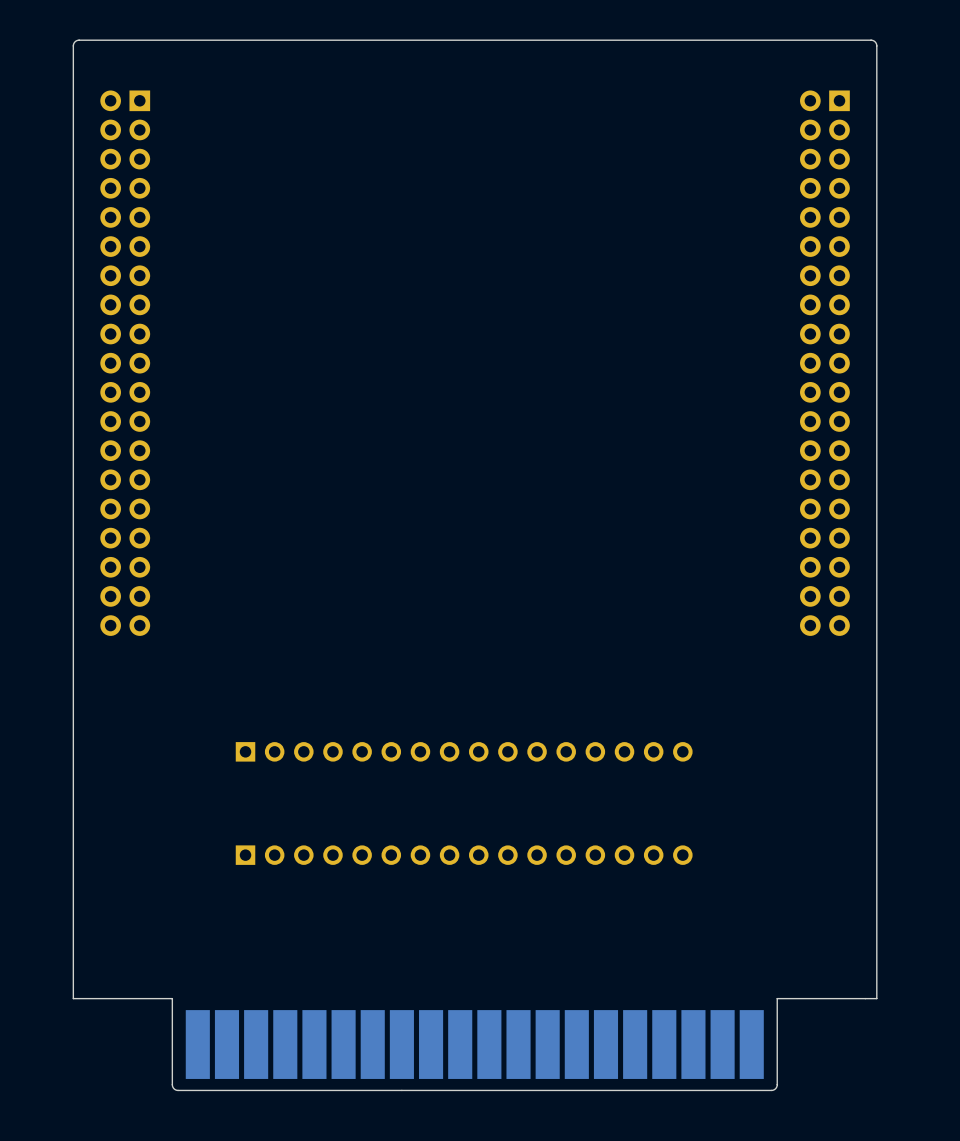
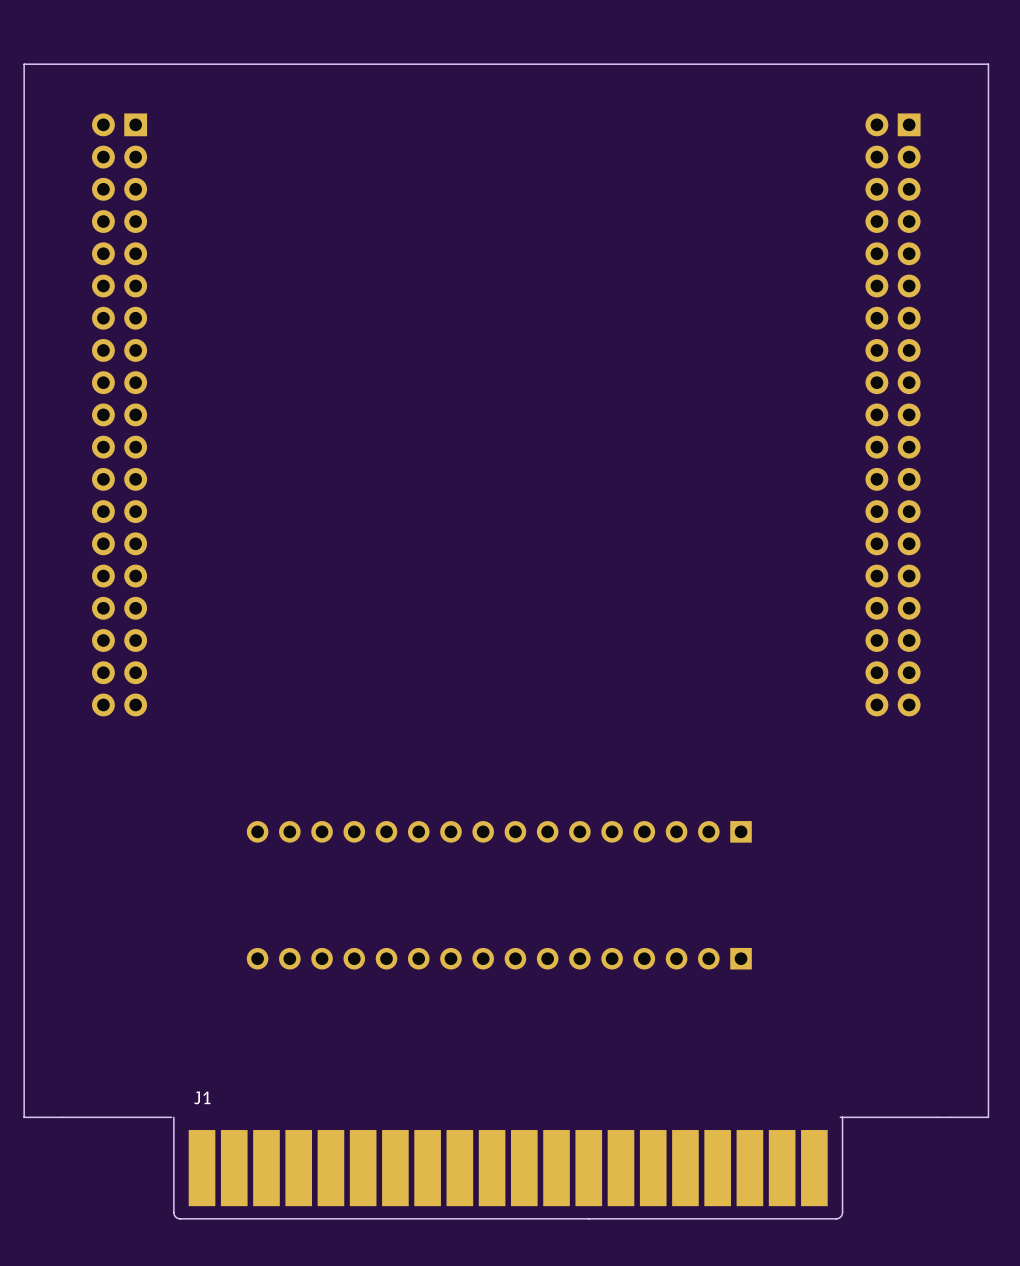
part rotation: 0° (464, 751) -> 180° (499, 831)
part rotation: 0° (464, 855) -> 180° (499, 958)
board edge: (876, 998) (876, 45) (875, 41) (871, 40) (79, 40) (74, 42) (73, 998) -> (950, 1117) (988, 1117) (988, 64) (24, 64) (24, 1117) (62, 1117)
J1 side: bottom (474, 1044) -> top (508, 1168)

